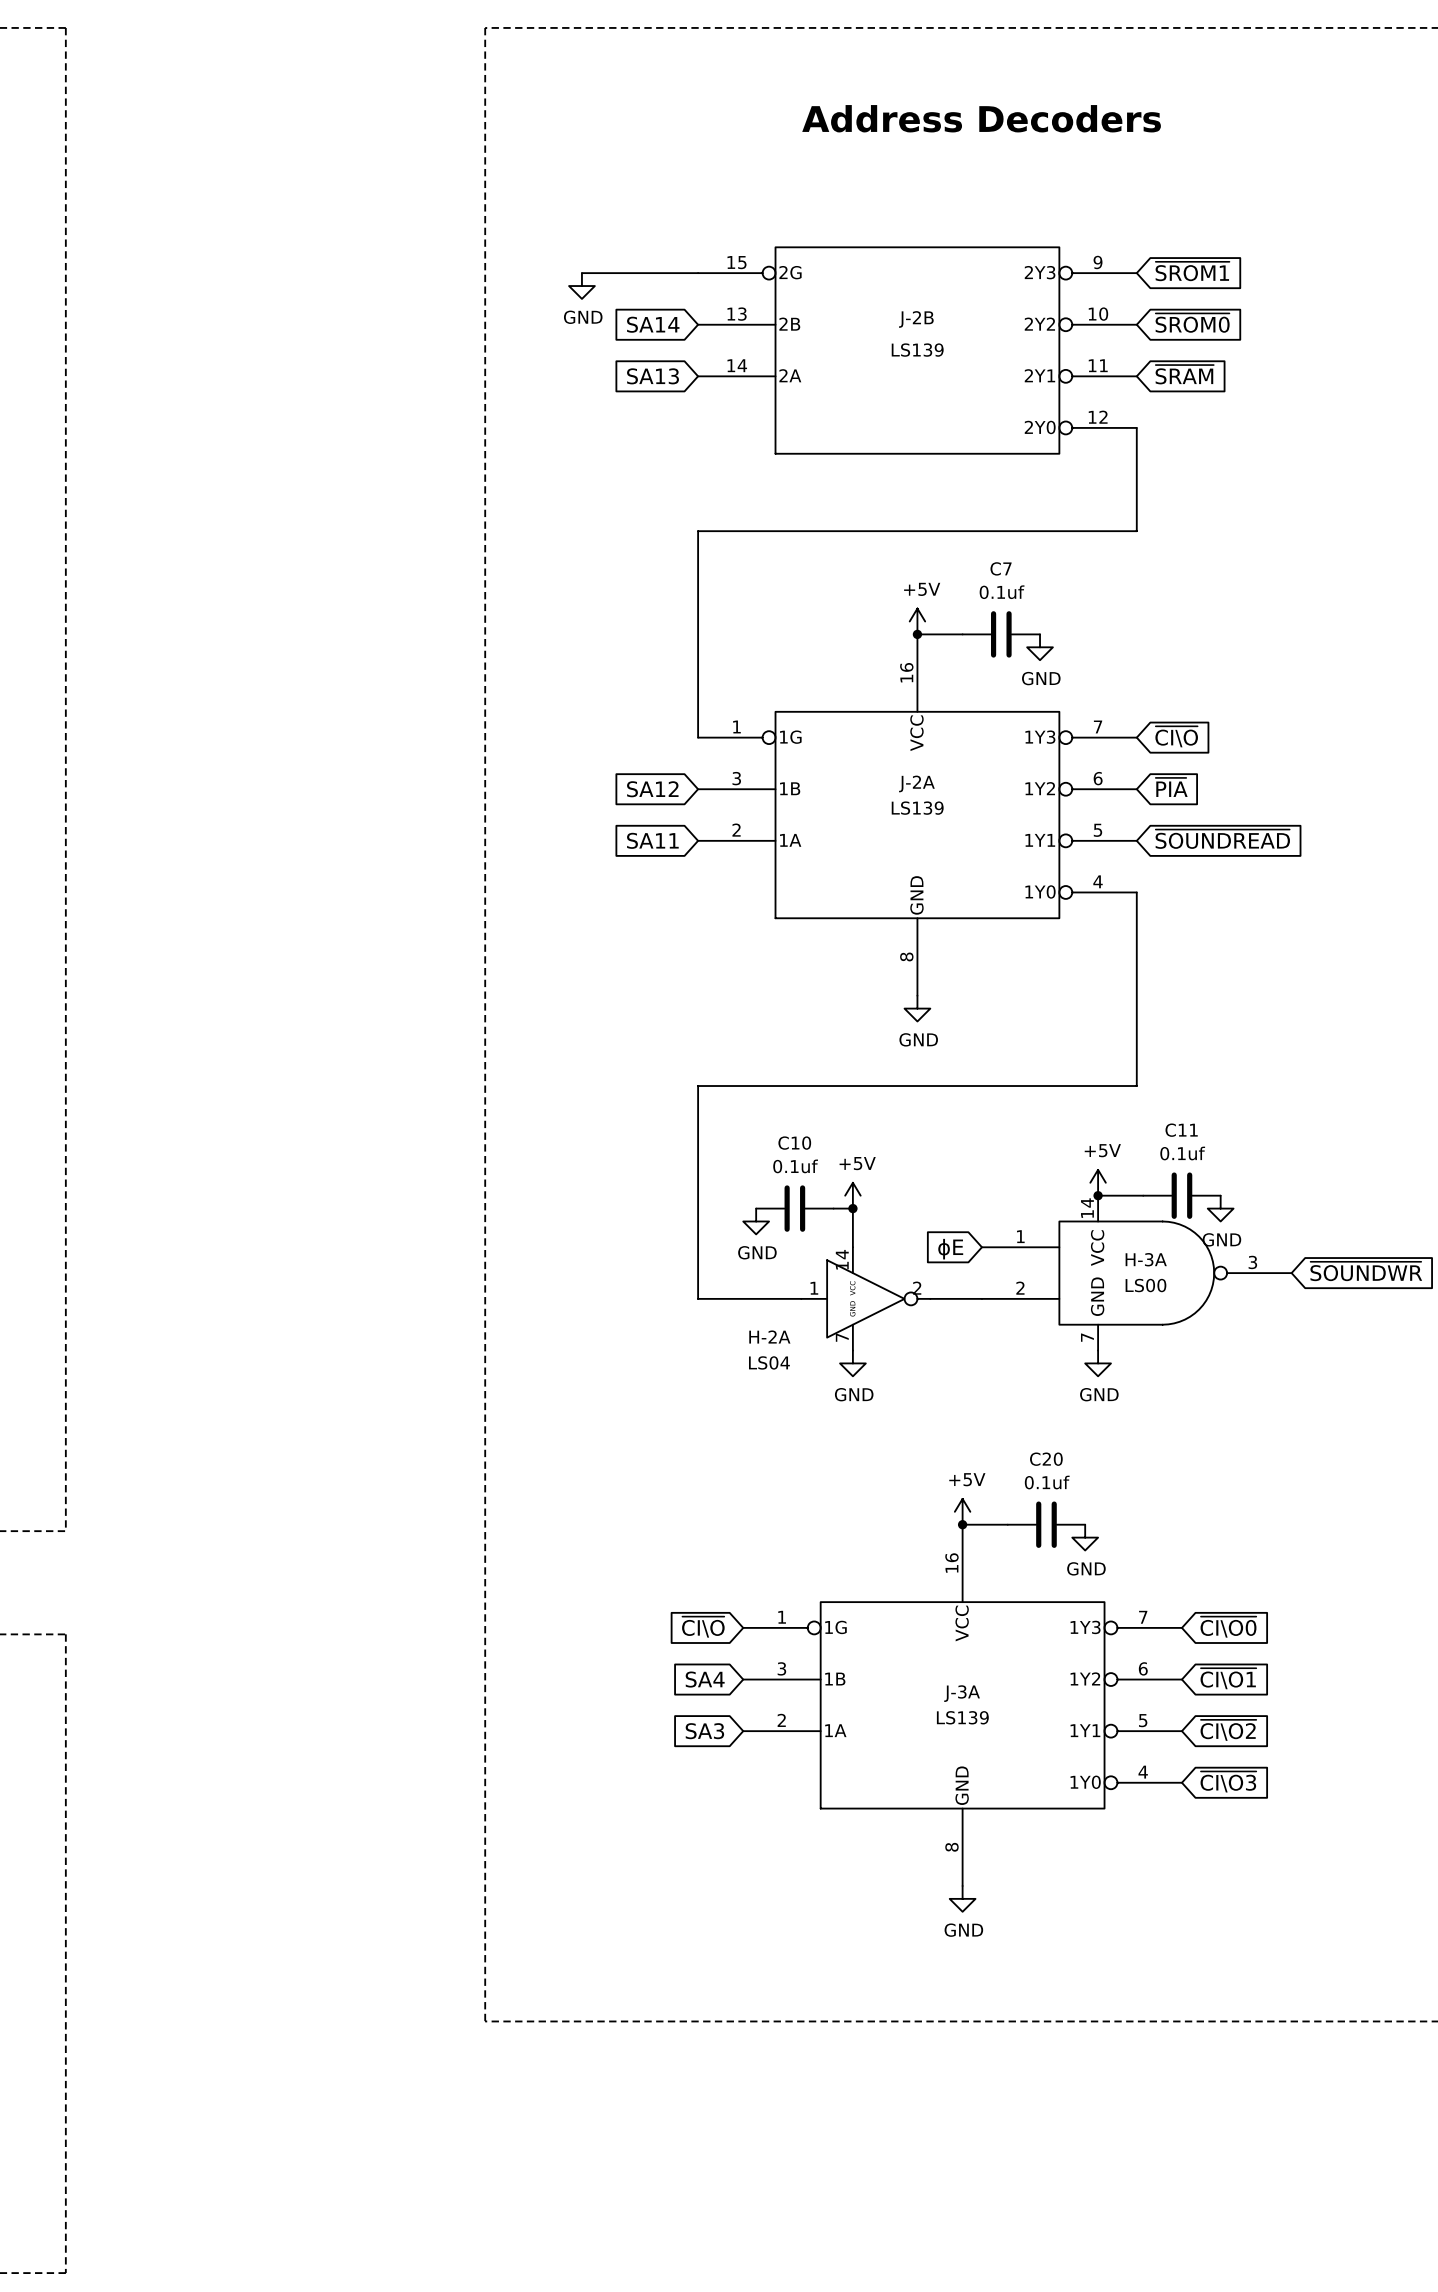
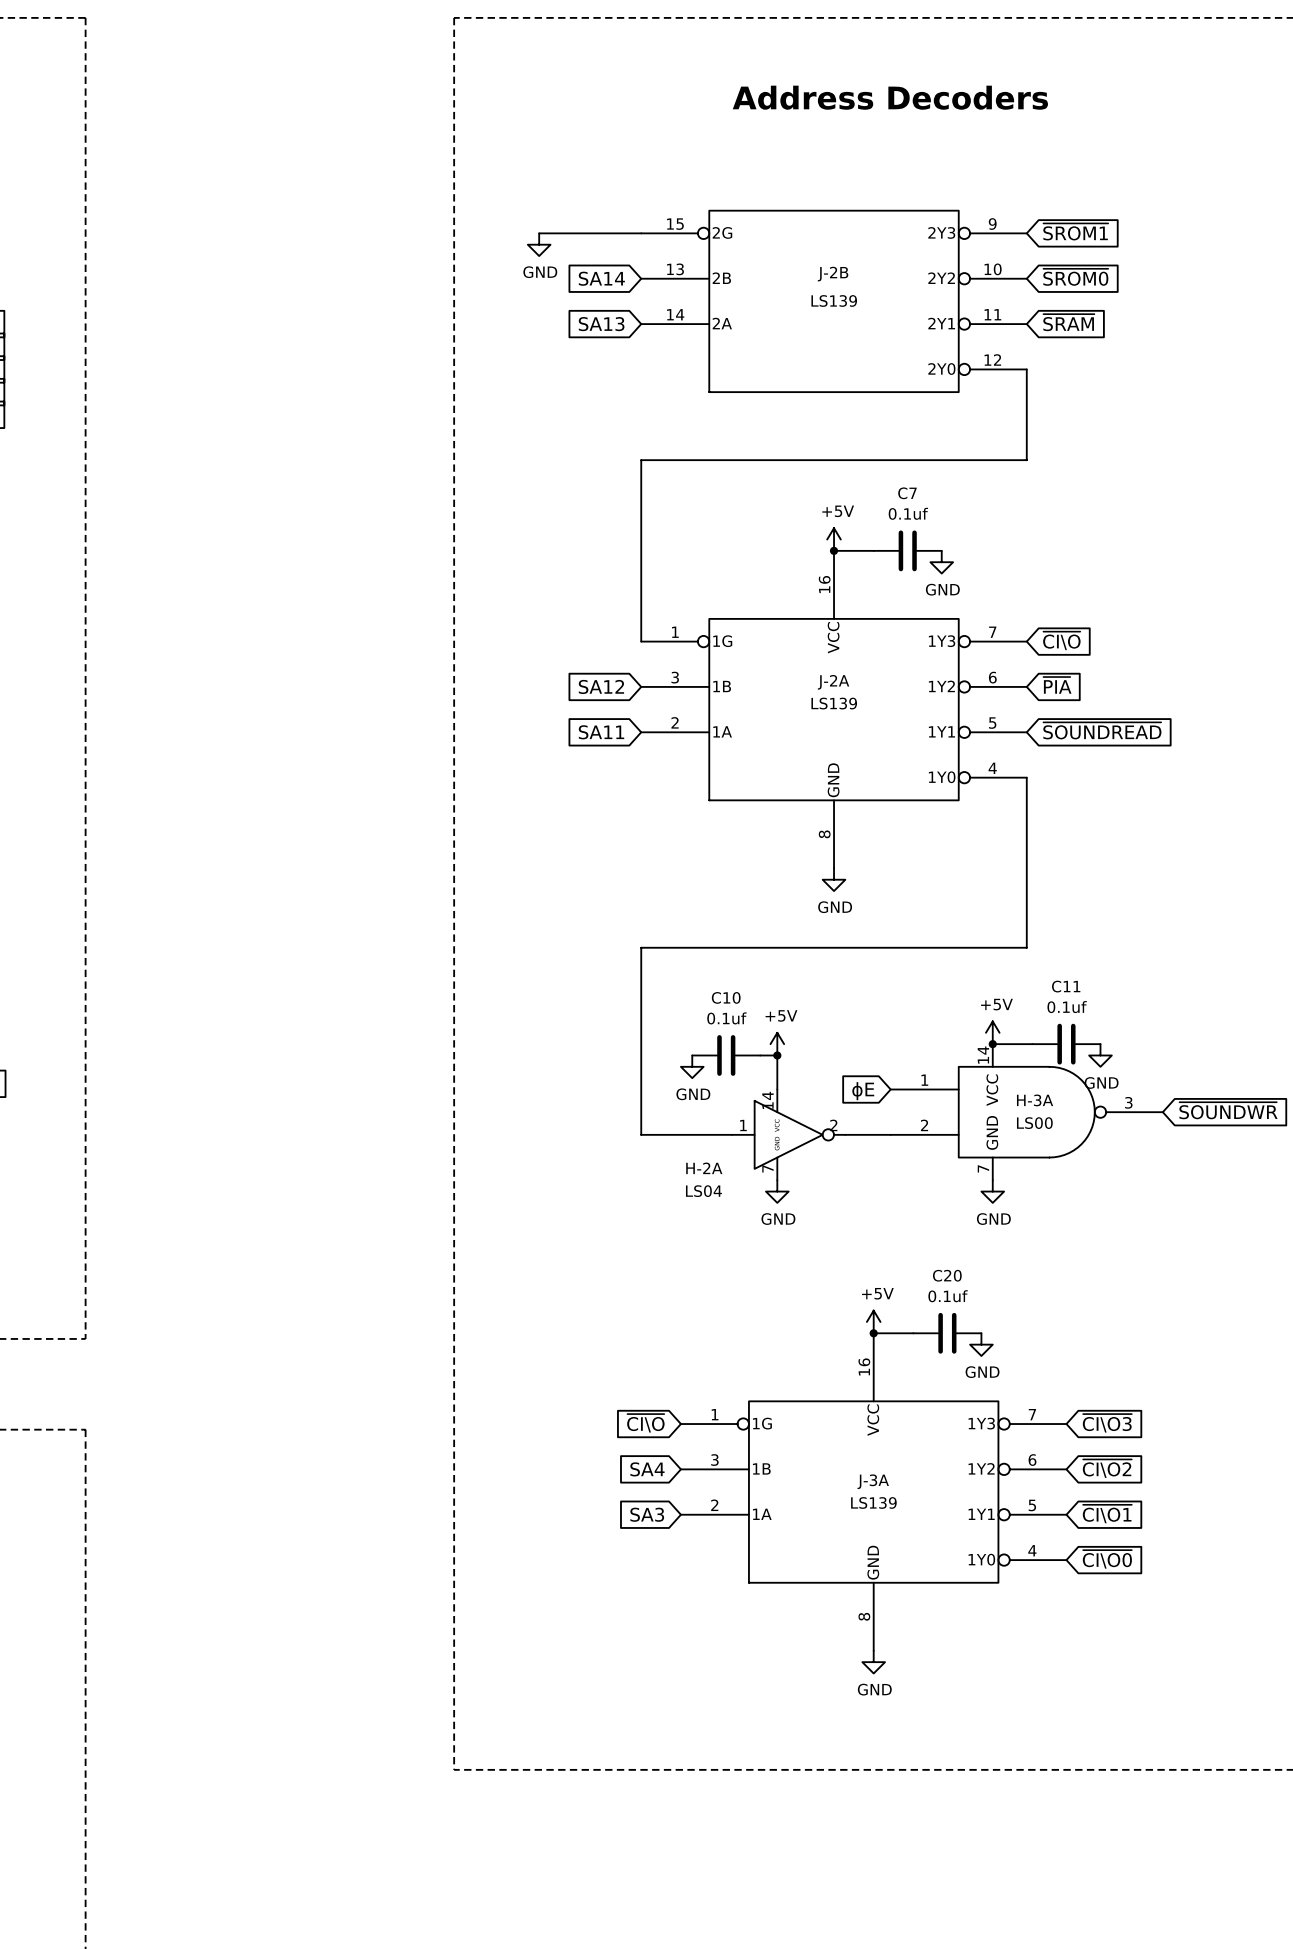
global label: ~{CI\O0} (1228, 1627) -> ~{CI\O3} (1107, 1423)
global label: ~{CI\O1} (1228, 1678) -> ~{CI\O2} (1107, 1468)
global label: ~{CI\O2} (1228, 1730) -> ~{CI\O1} (1107, 1514)
global label: ~{CI\O3} (1228, 1781) -> ~{CI\O0} (1107, 1559)

